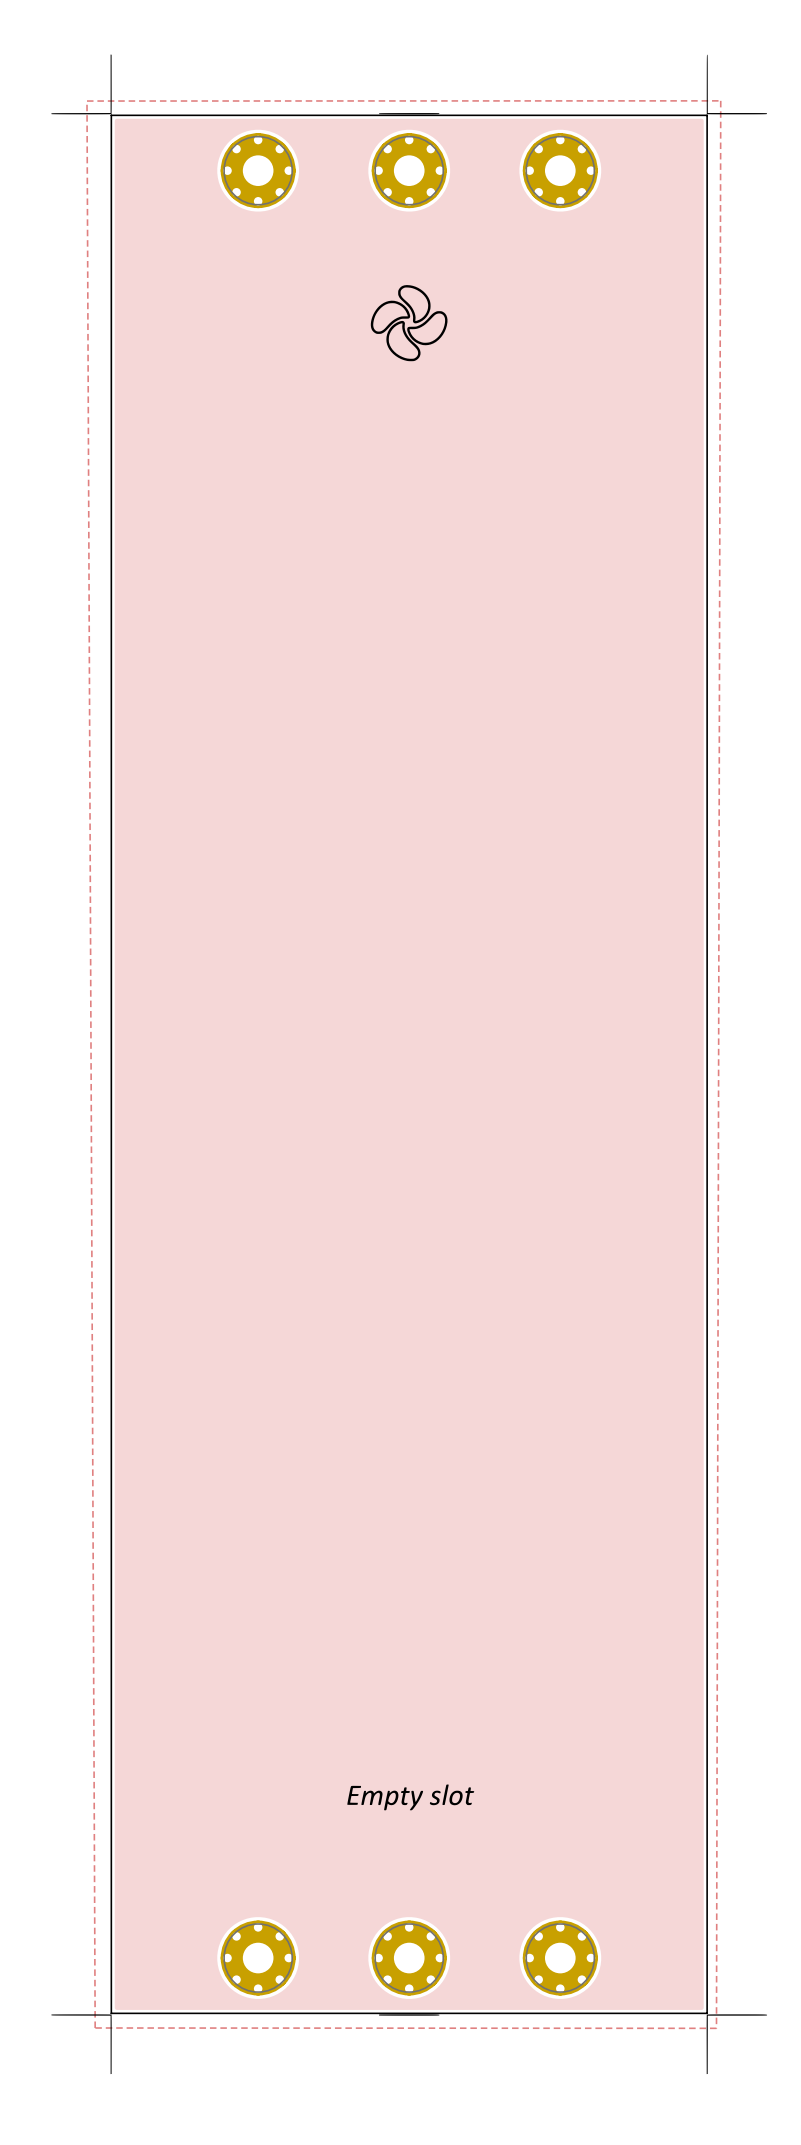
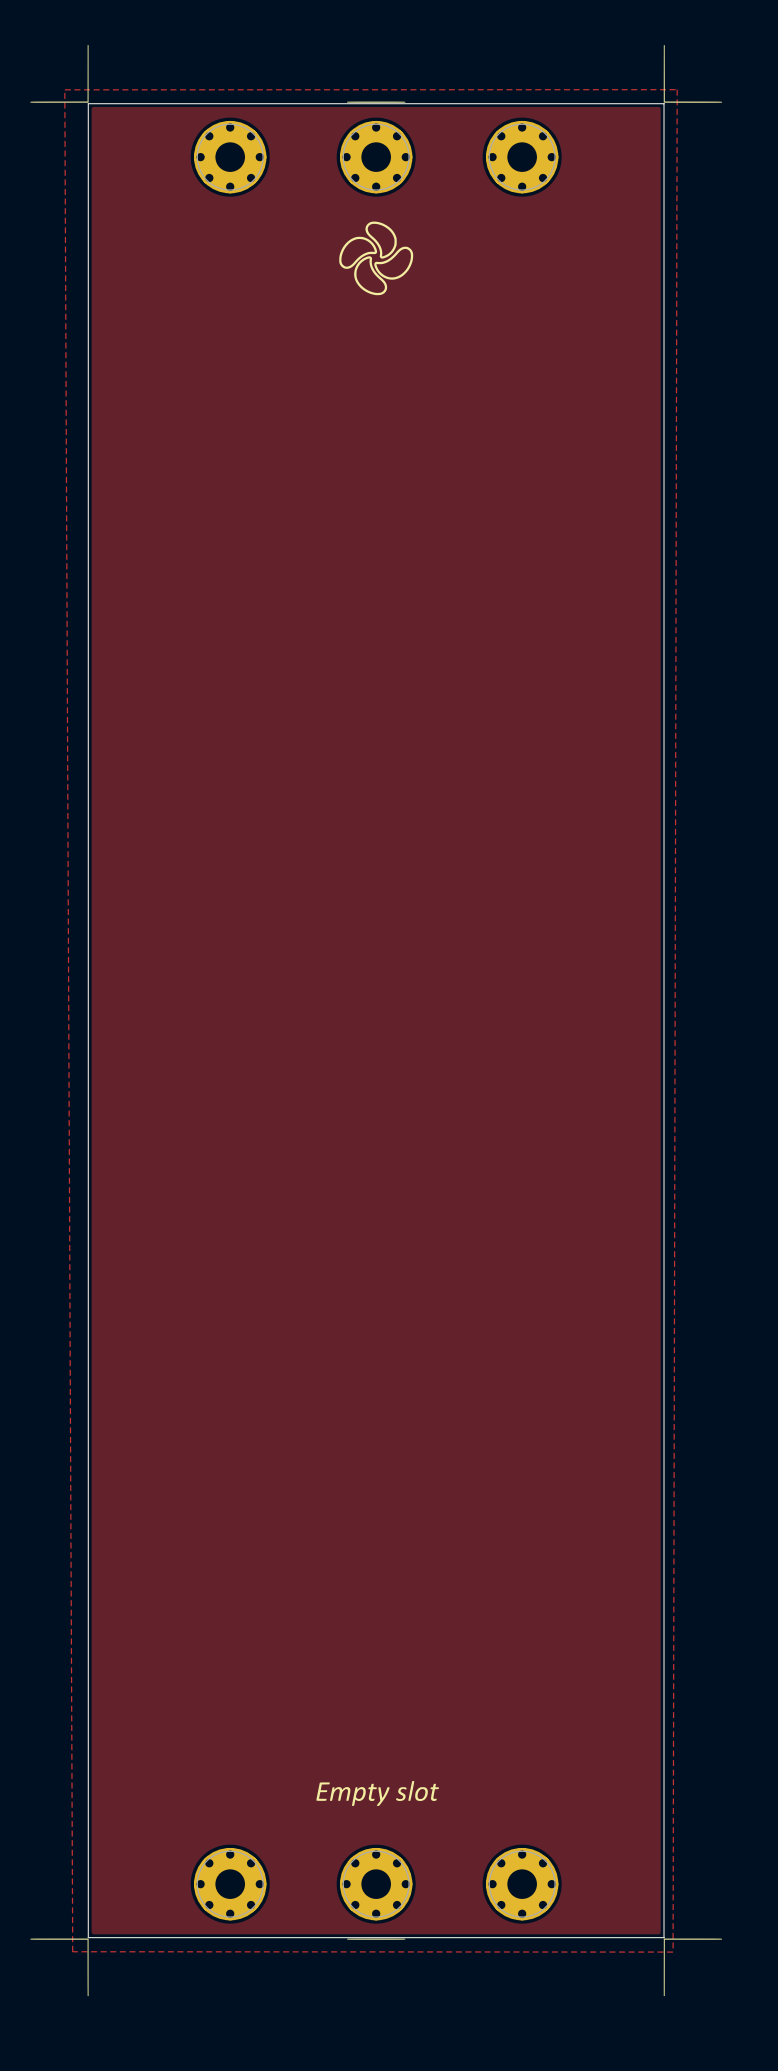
drawing shape: [51, 54, 768, 2075] -> [30, 45, 723, 1997]

